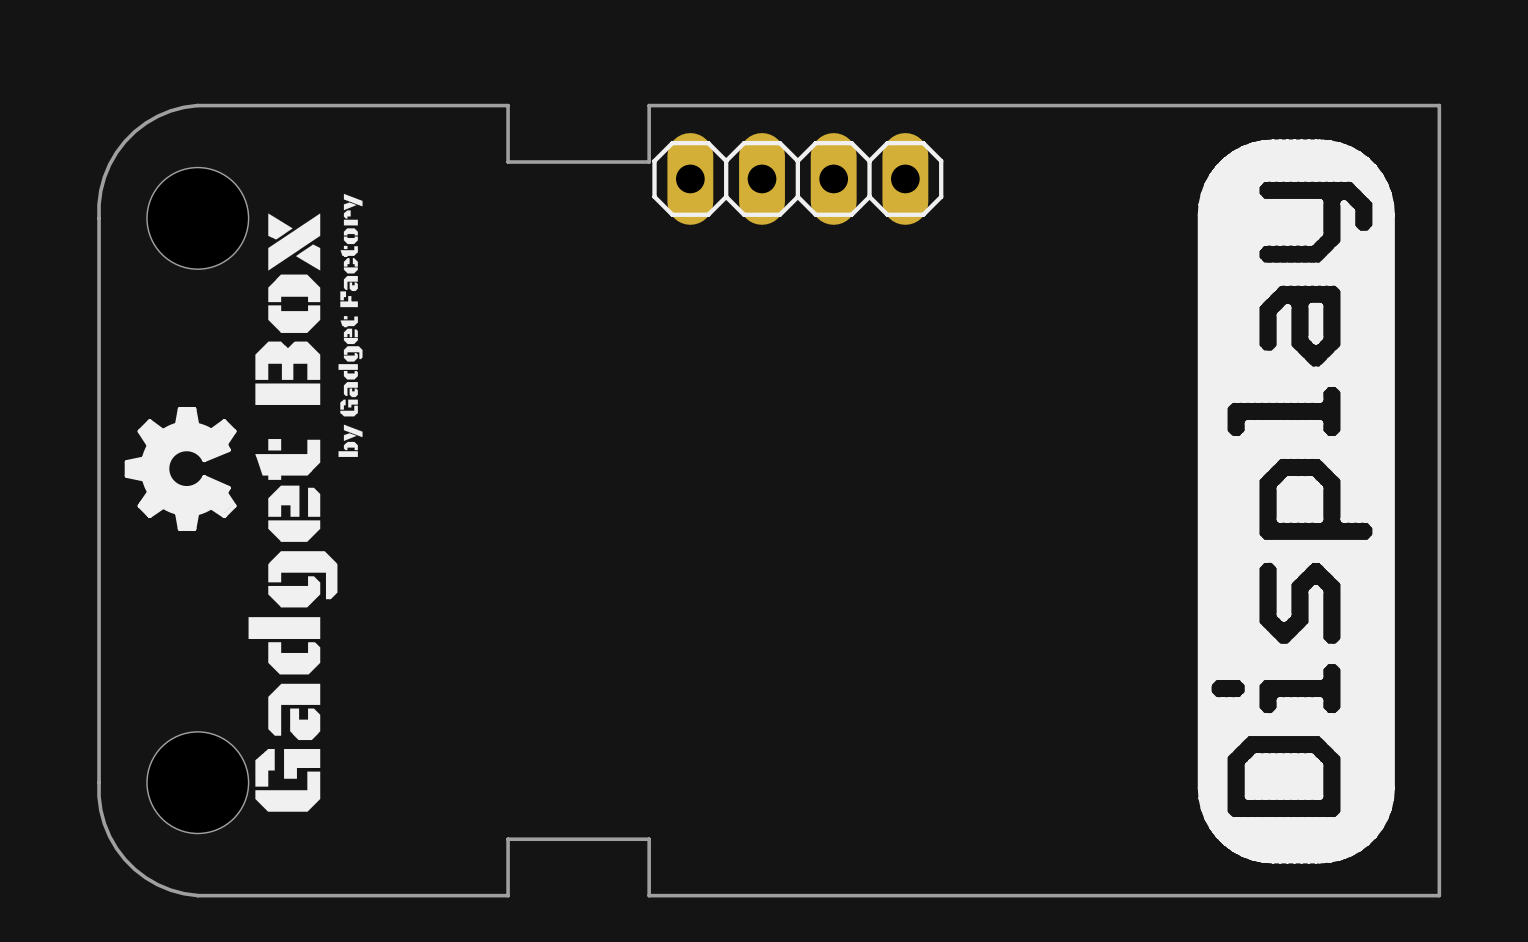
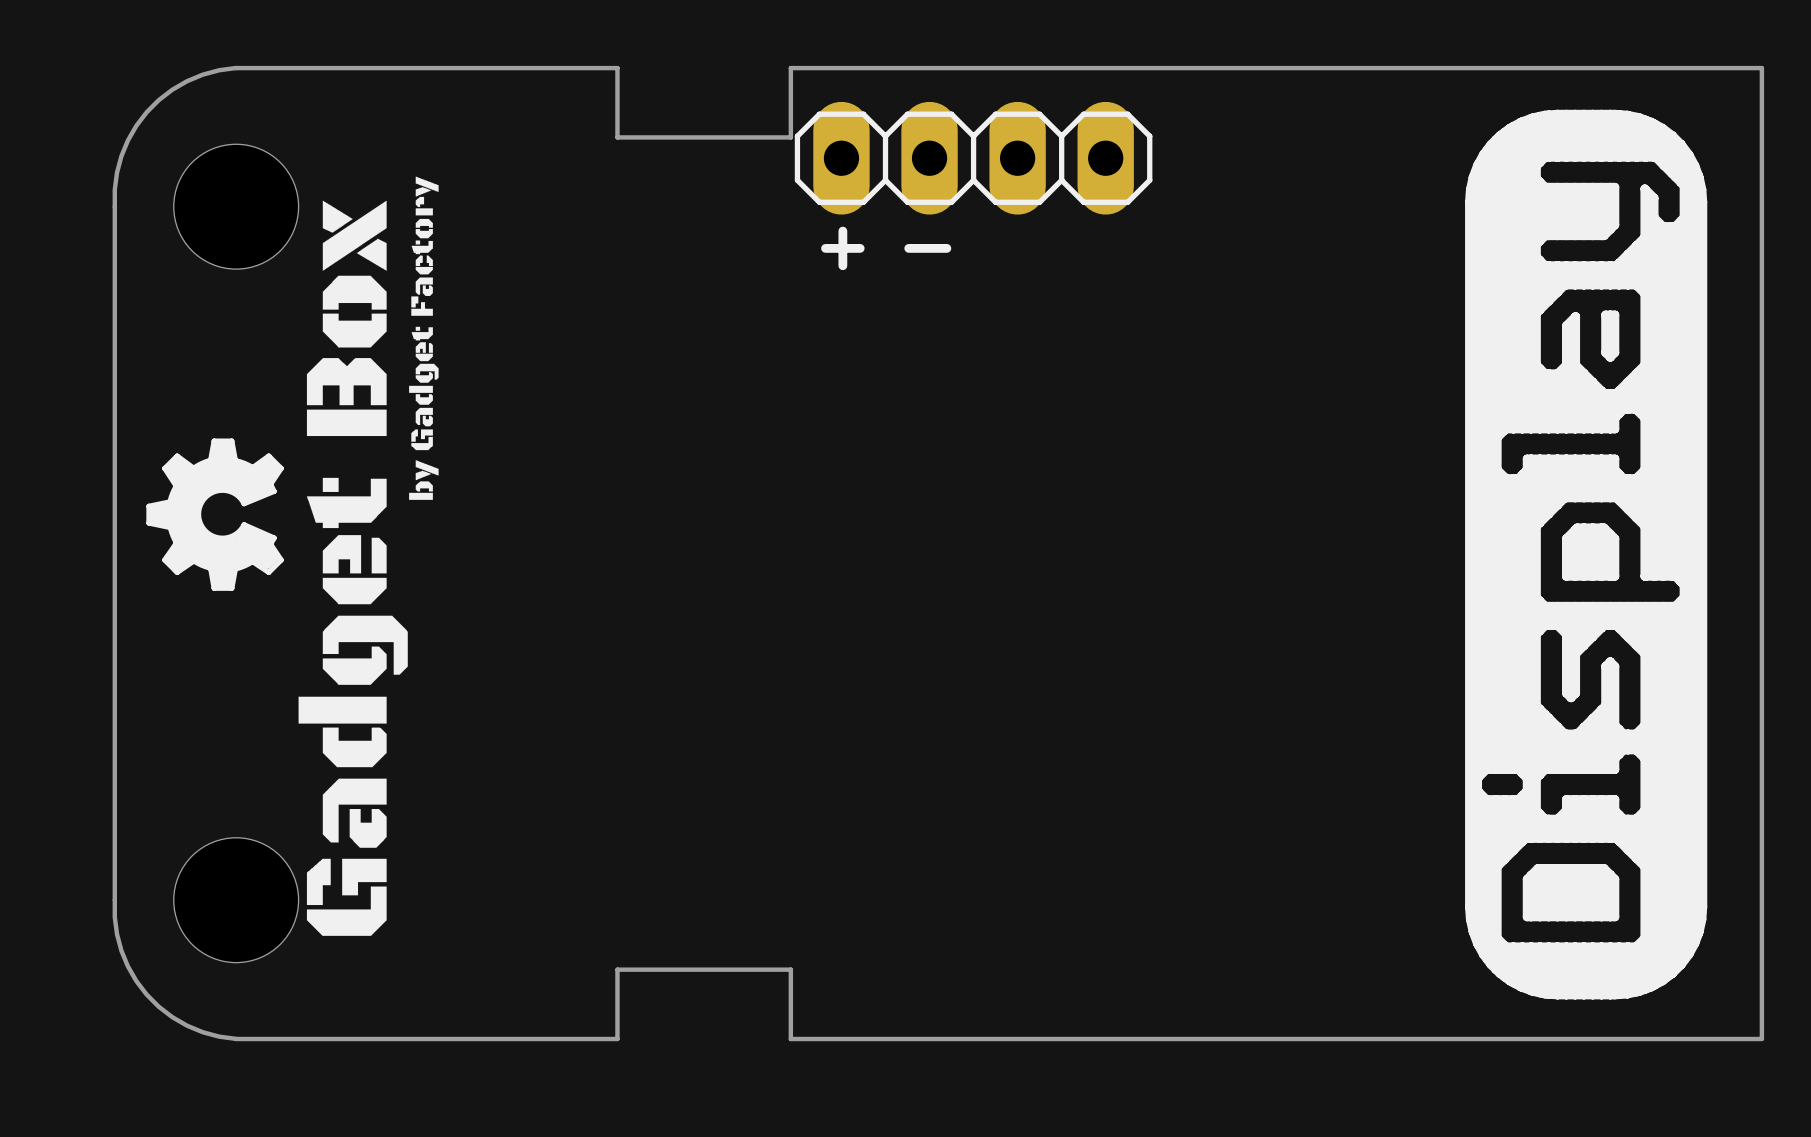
line: none -> (842, 231) (842, 265)
line: none -> (825, 248) (860, 248)
line: none -> (908, 248) (946, 248)

